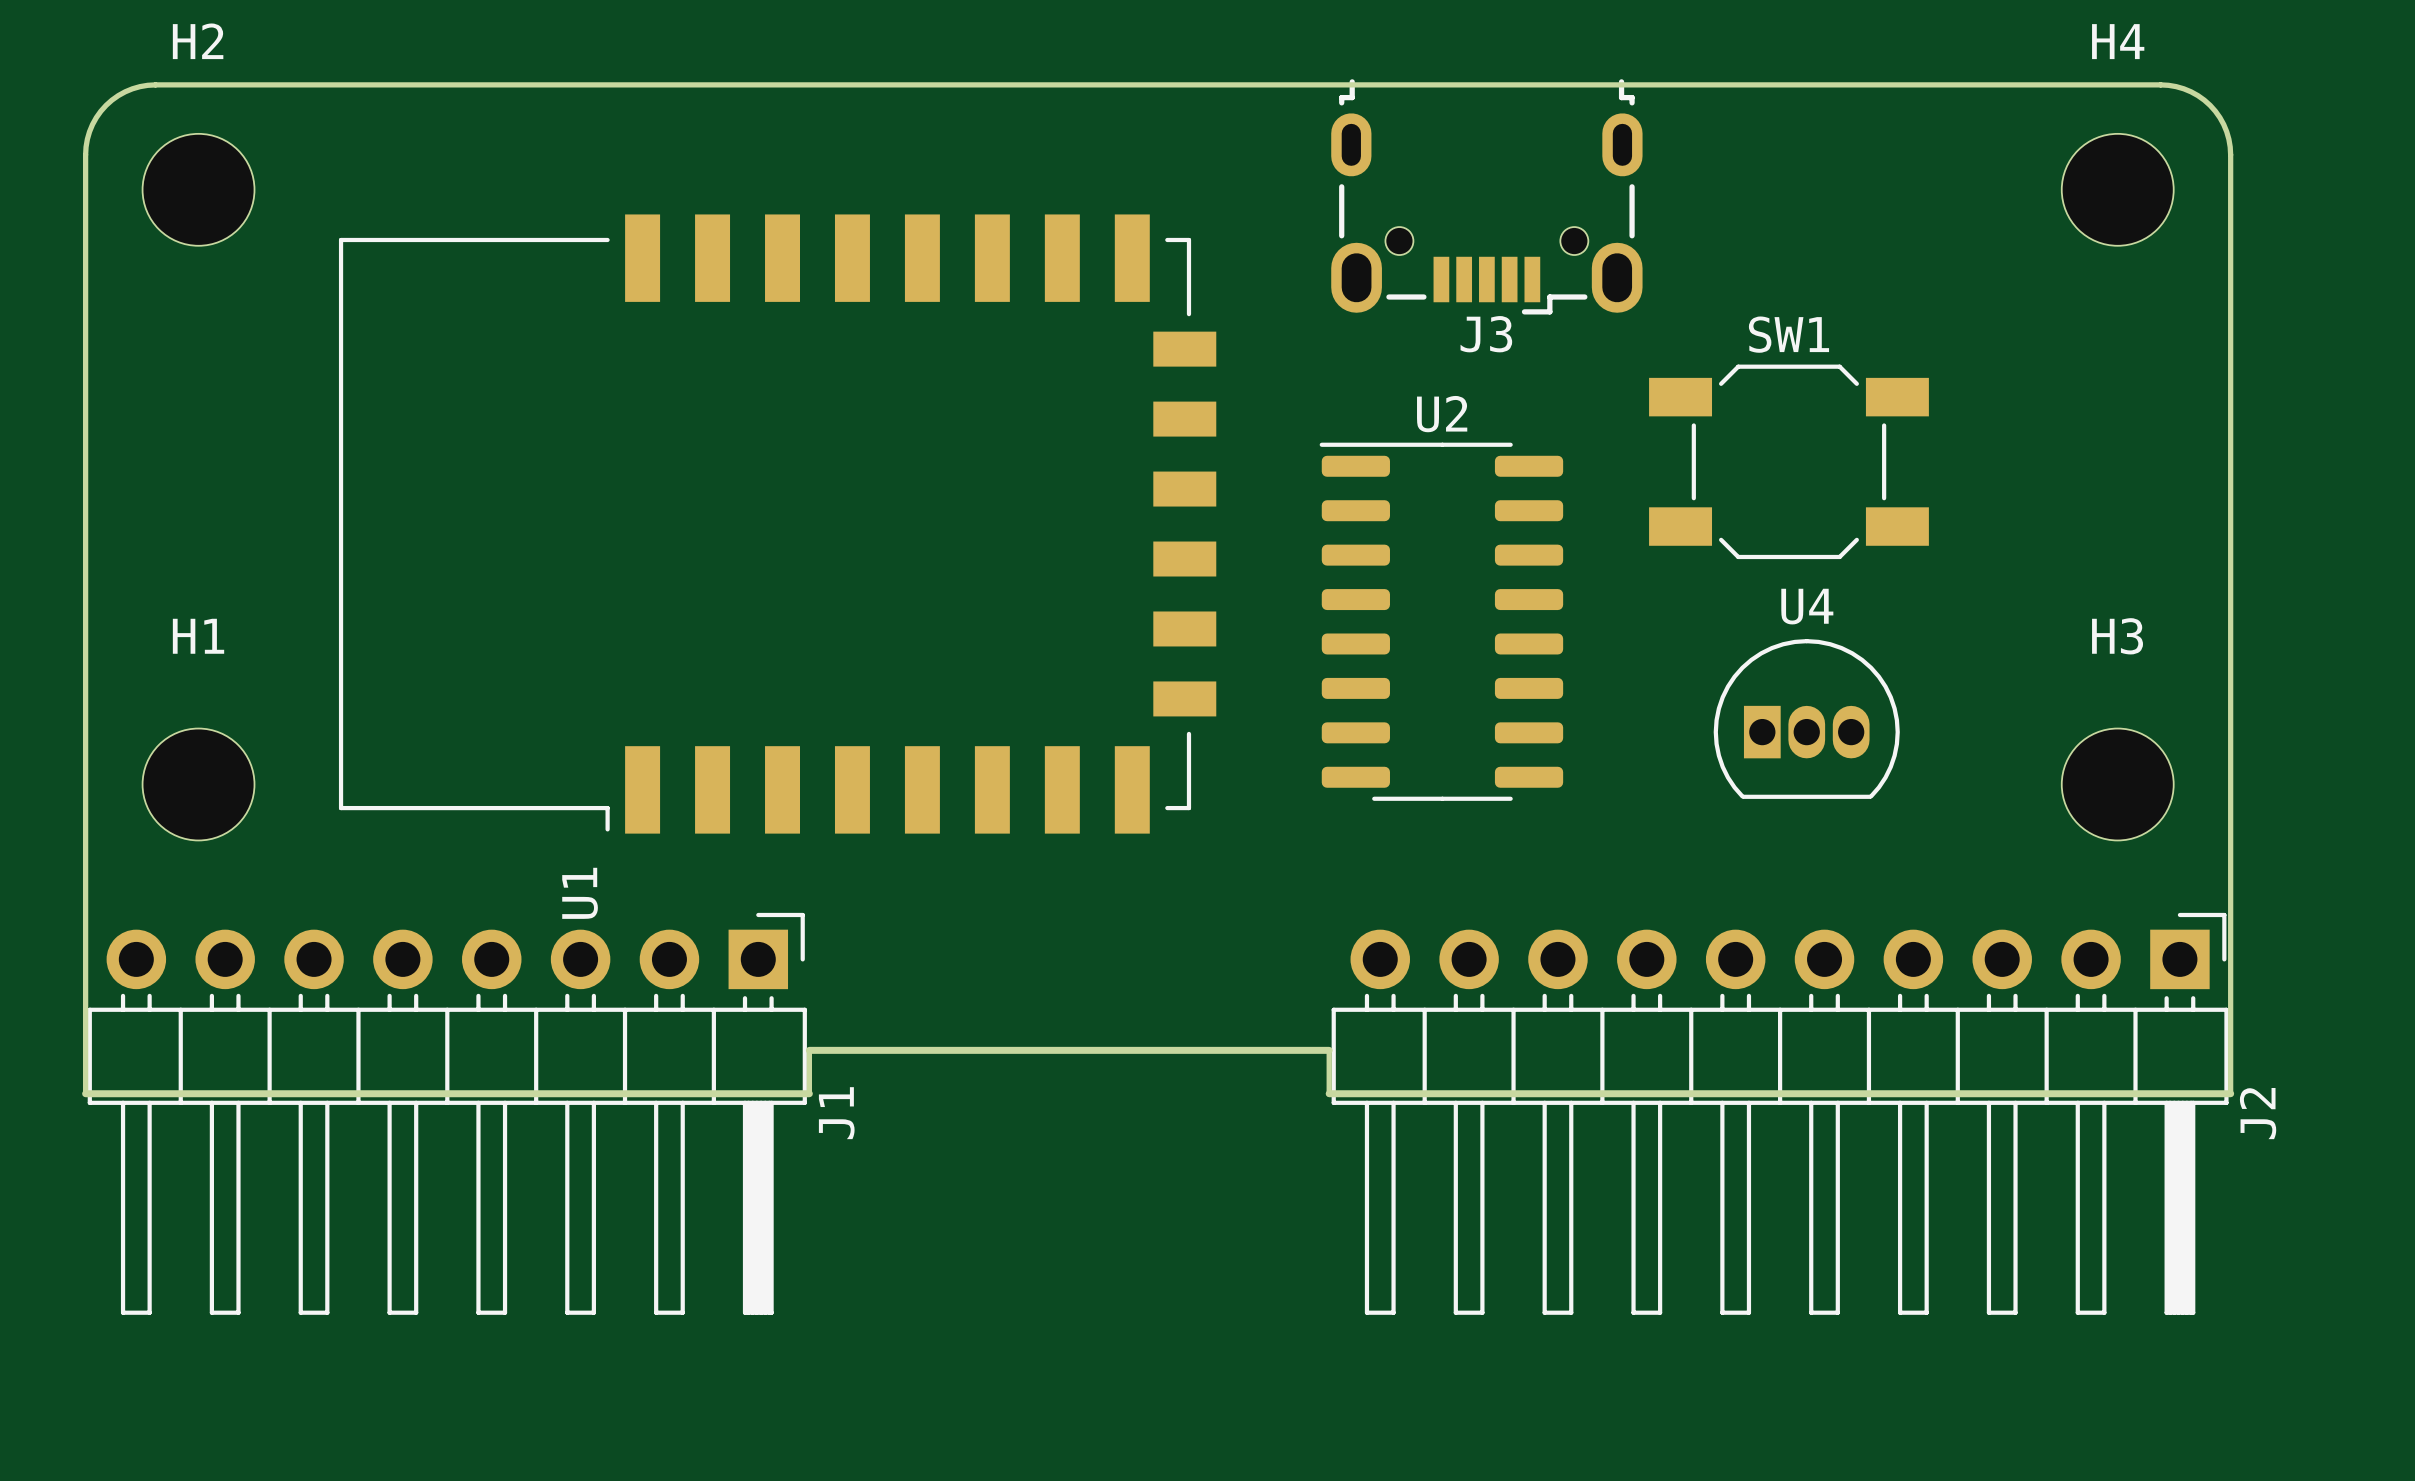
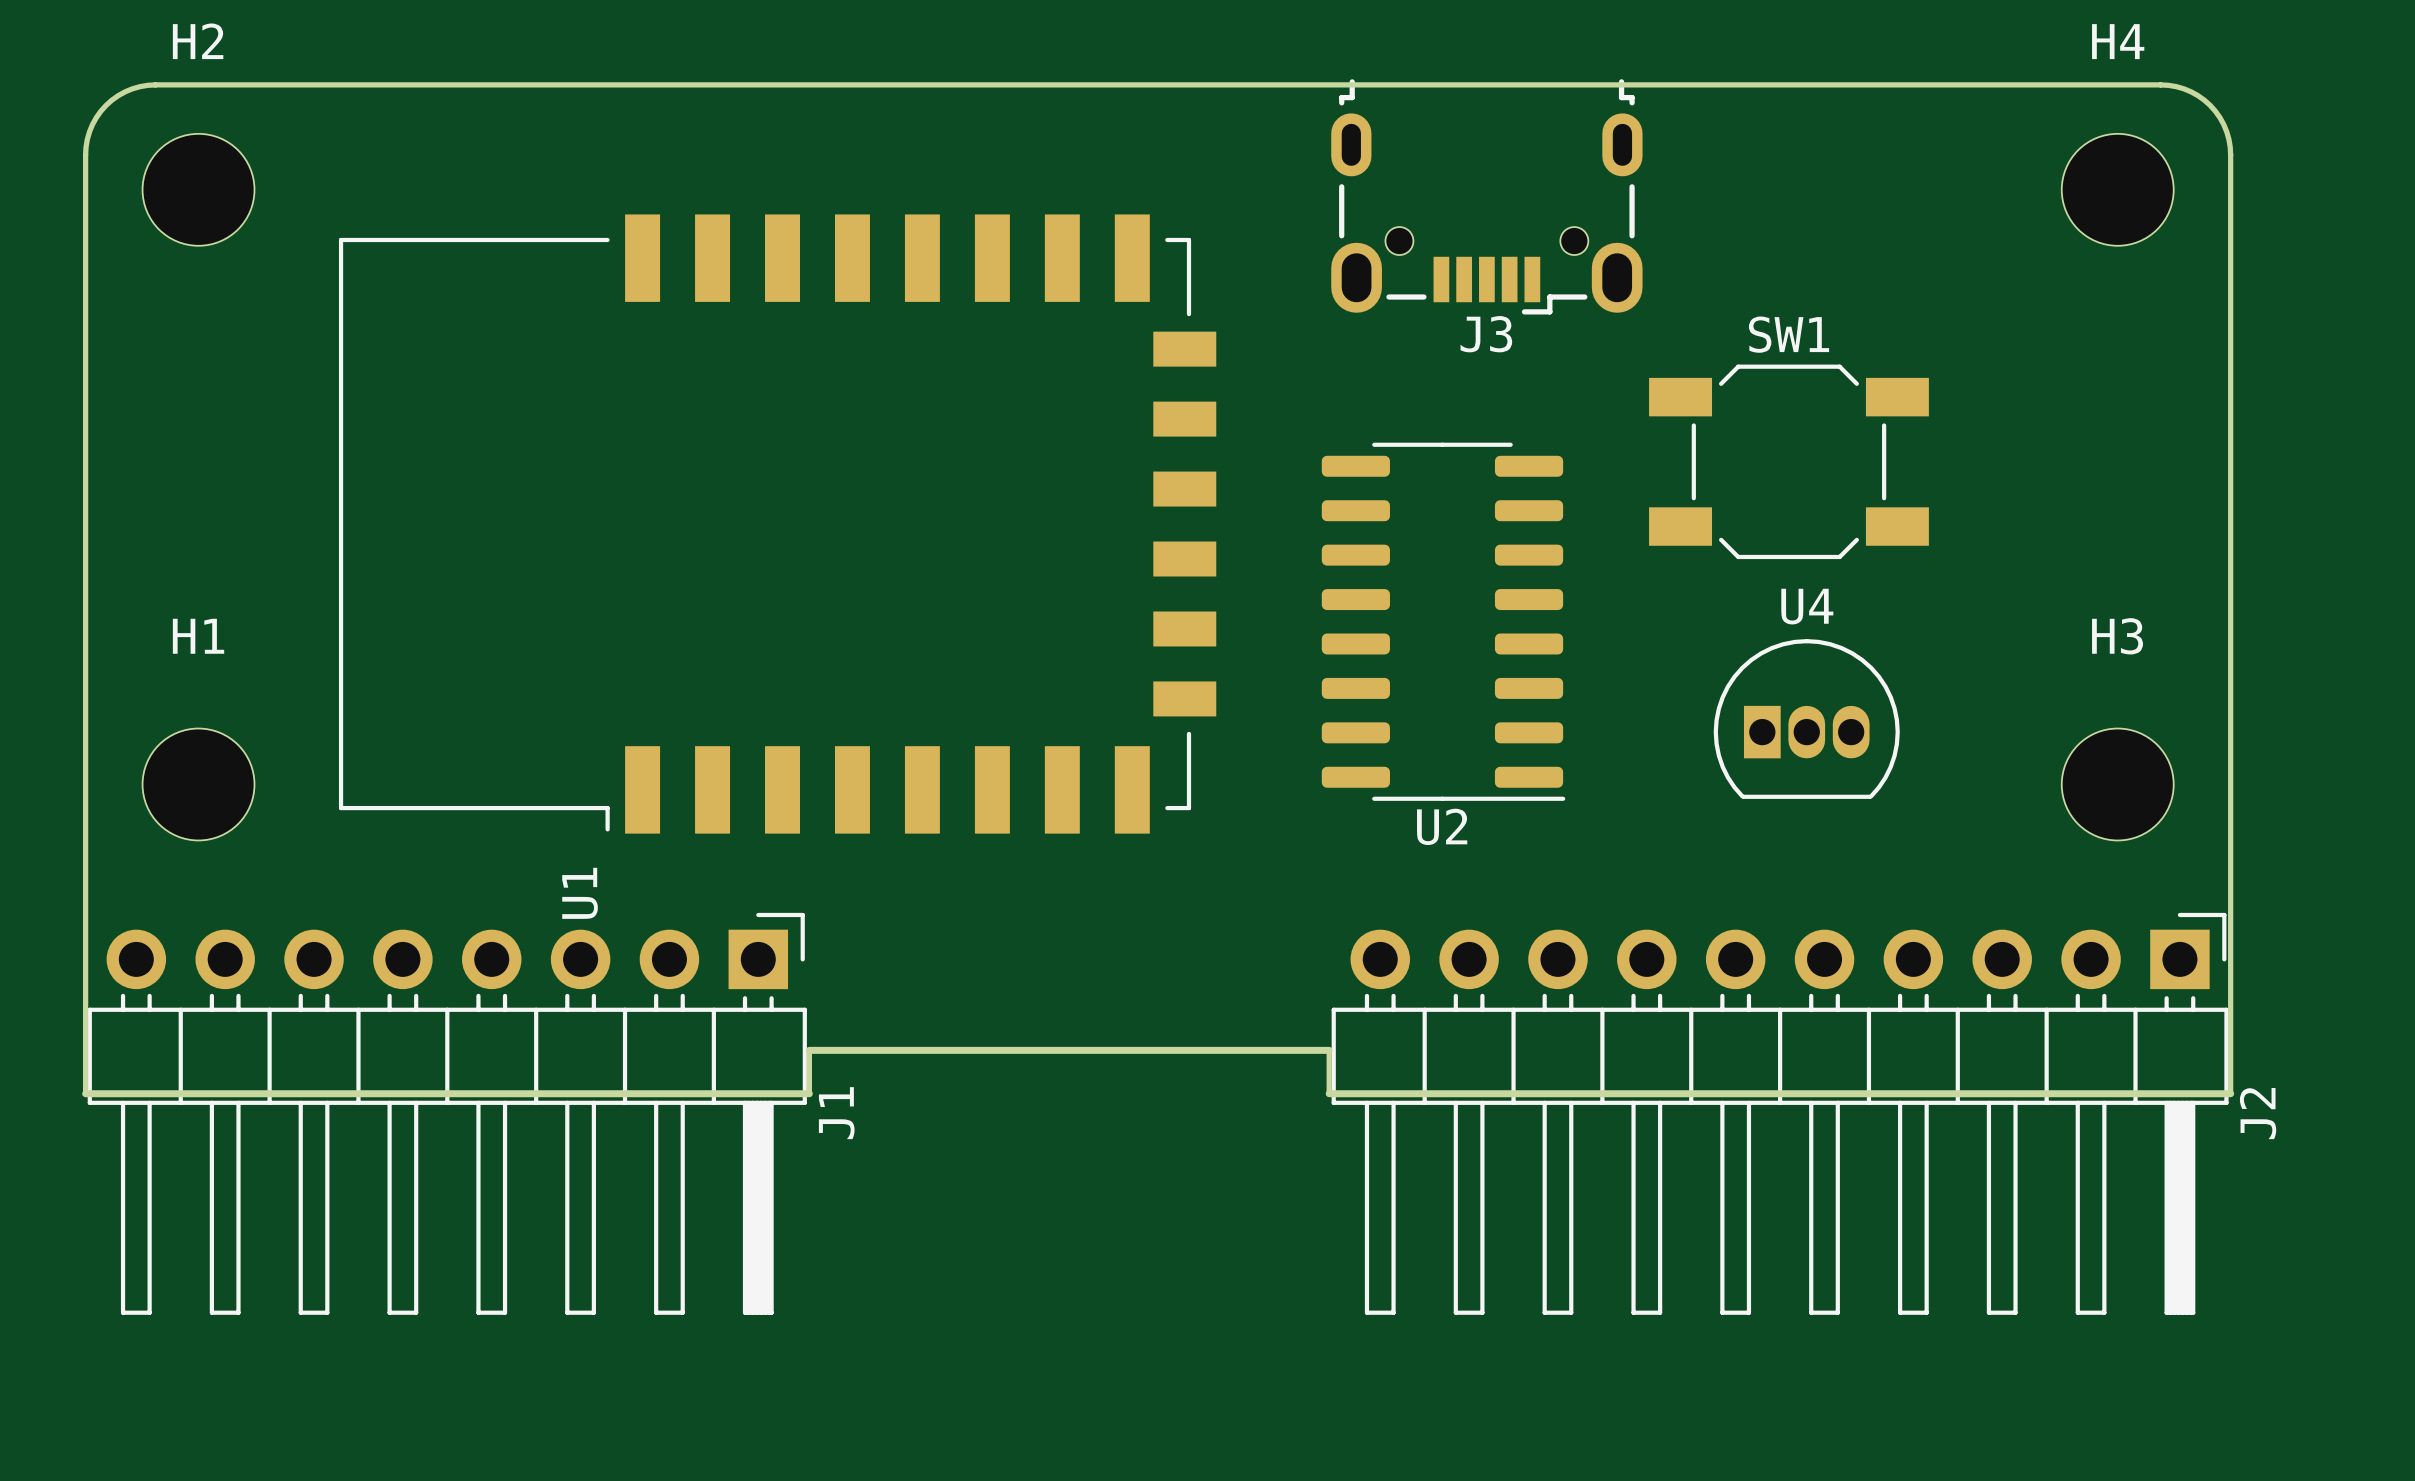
U2 rotation: 0° (1441, 621) -> 180° (1443, 621)

